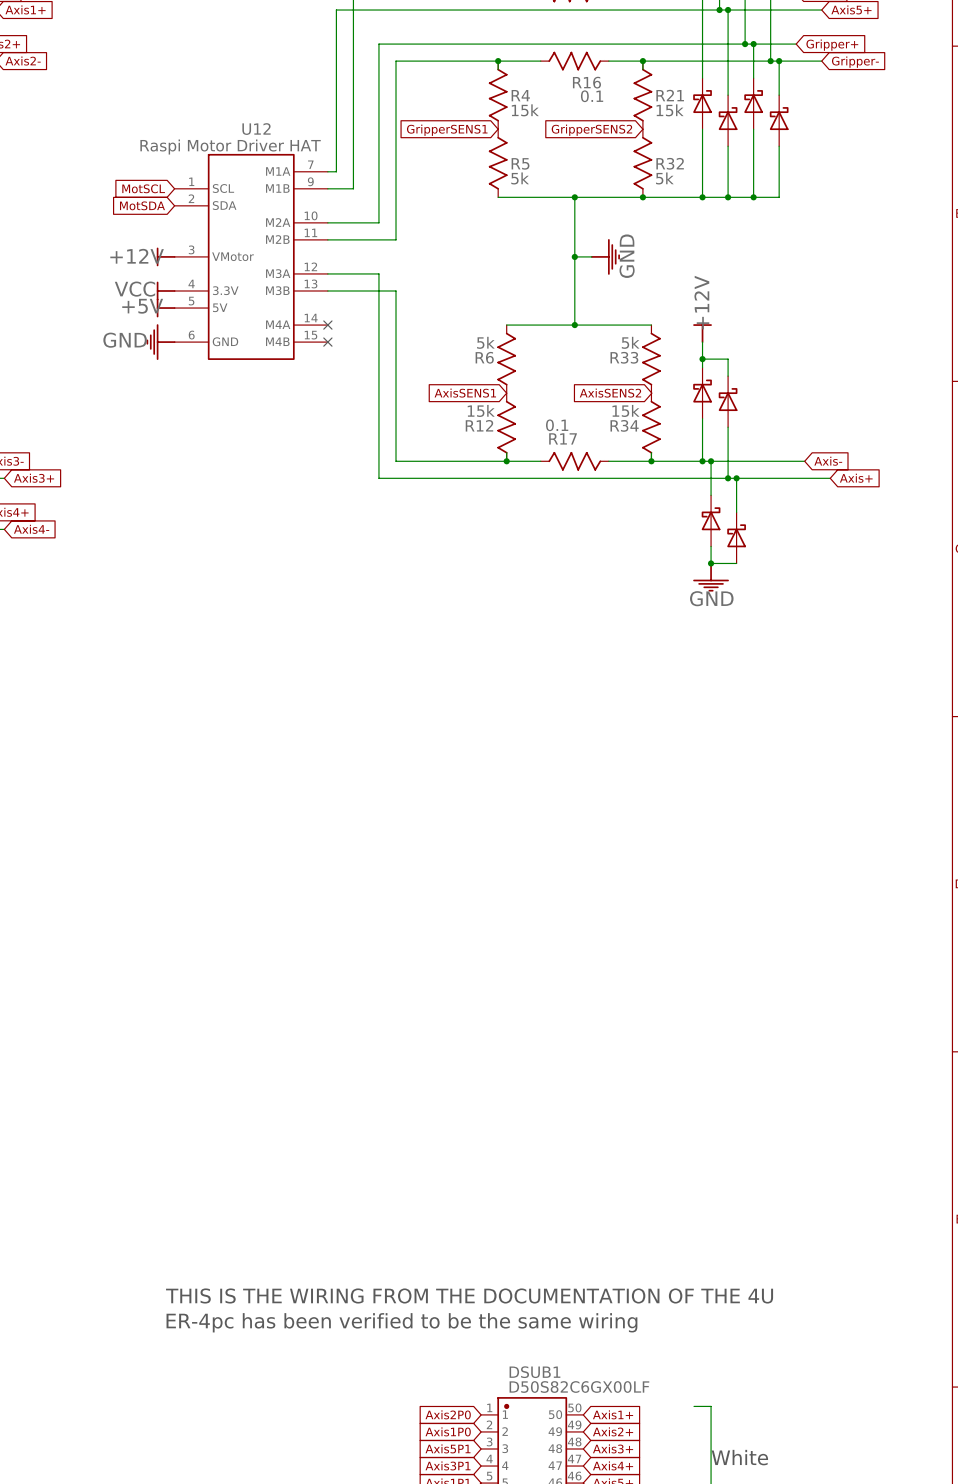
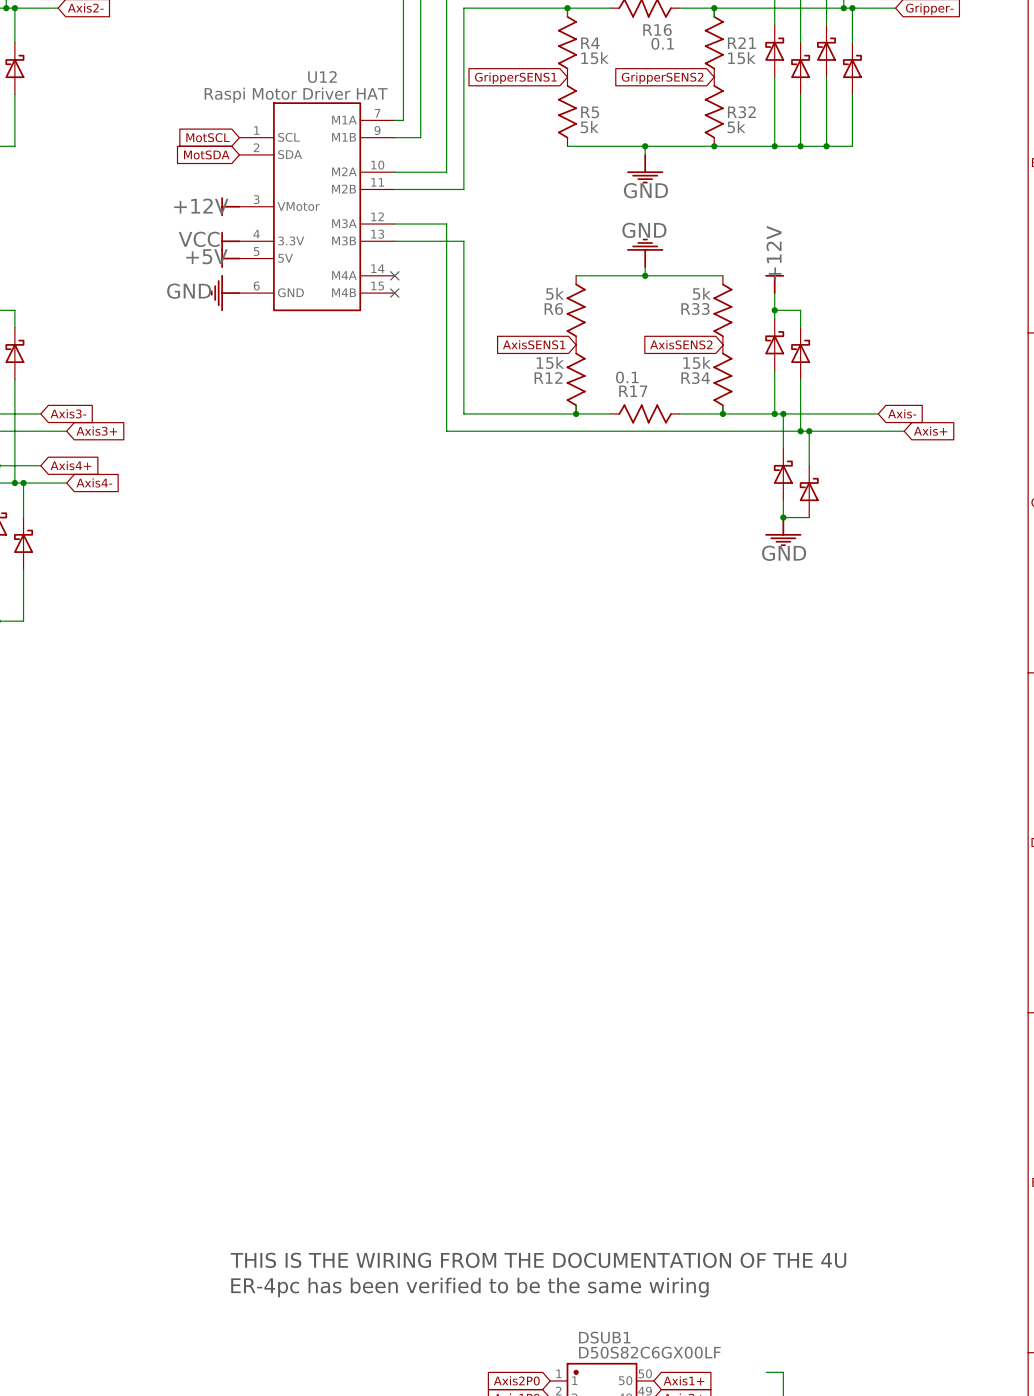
wire: (574, 205) (574, 316) -> none
power symbol: none -> GND (645, 168)
wire: (574, 256) (591, 256) -> none
junction: (574, 256) -> none
power symbol: GND (605, 256) -> none
power symbol: none -> GND (645, 253)

